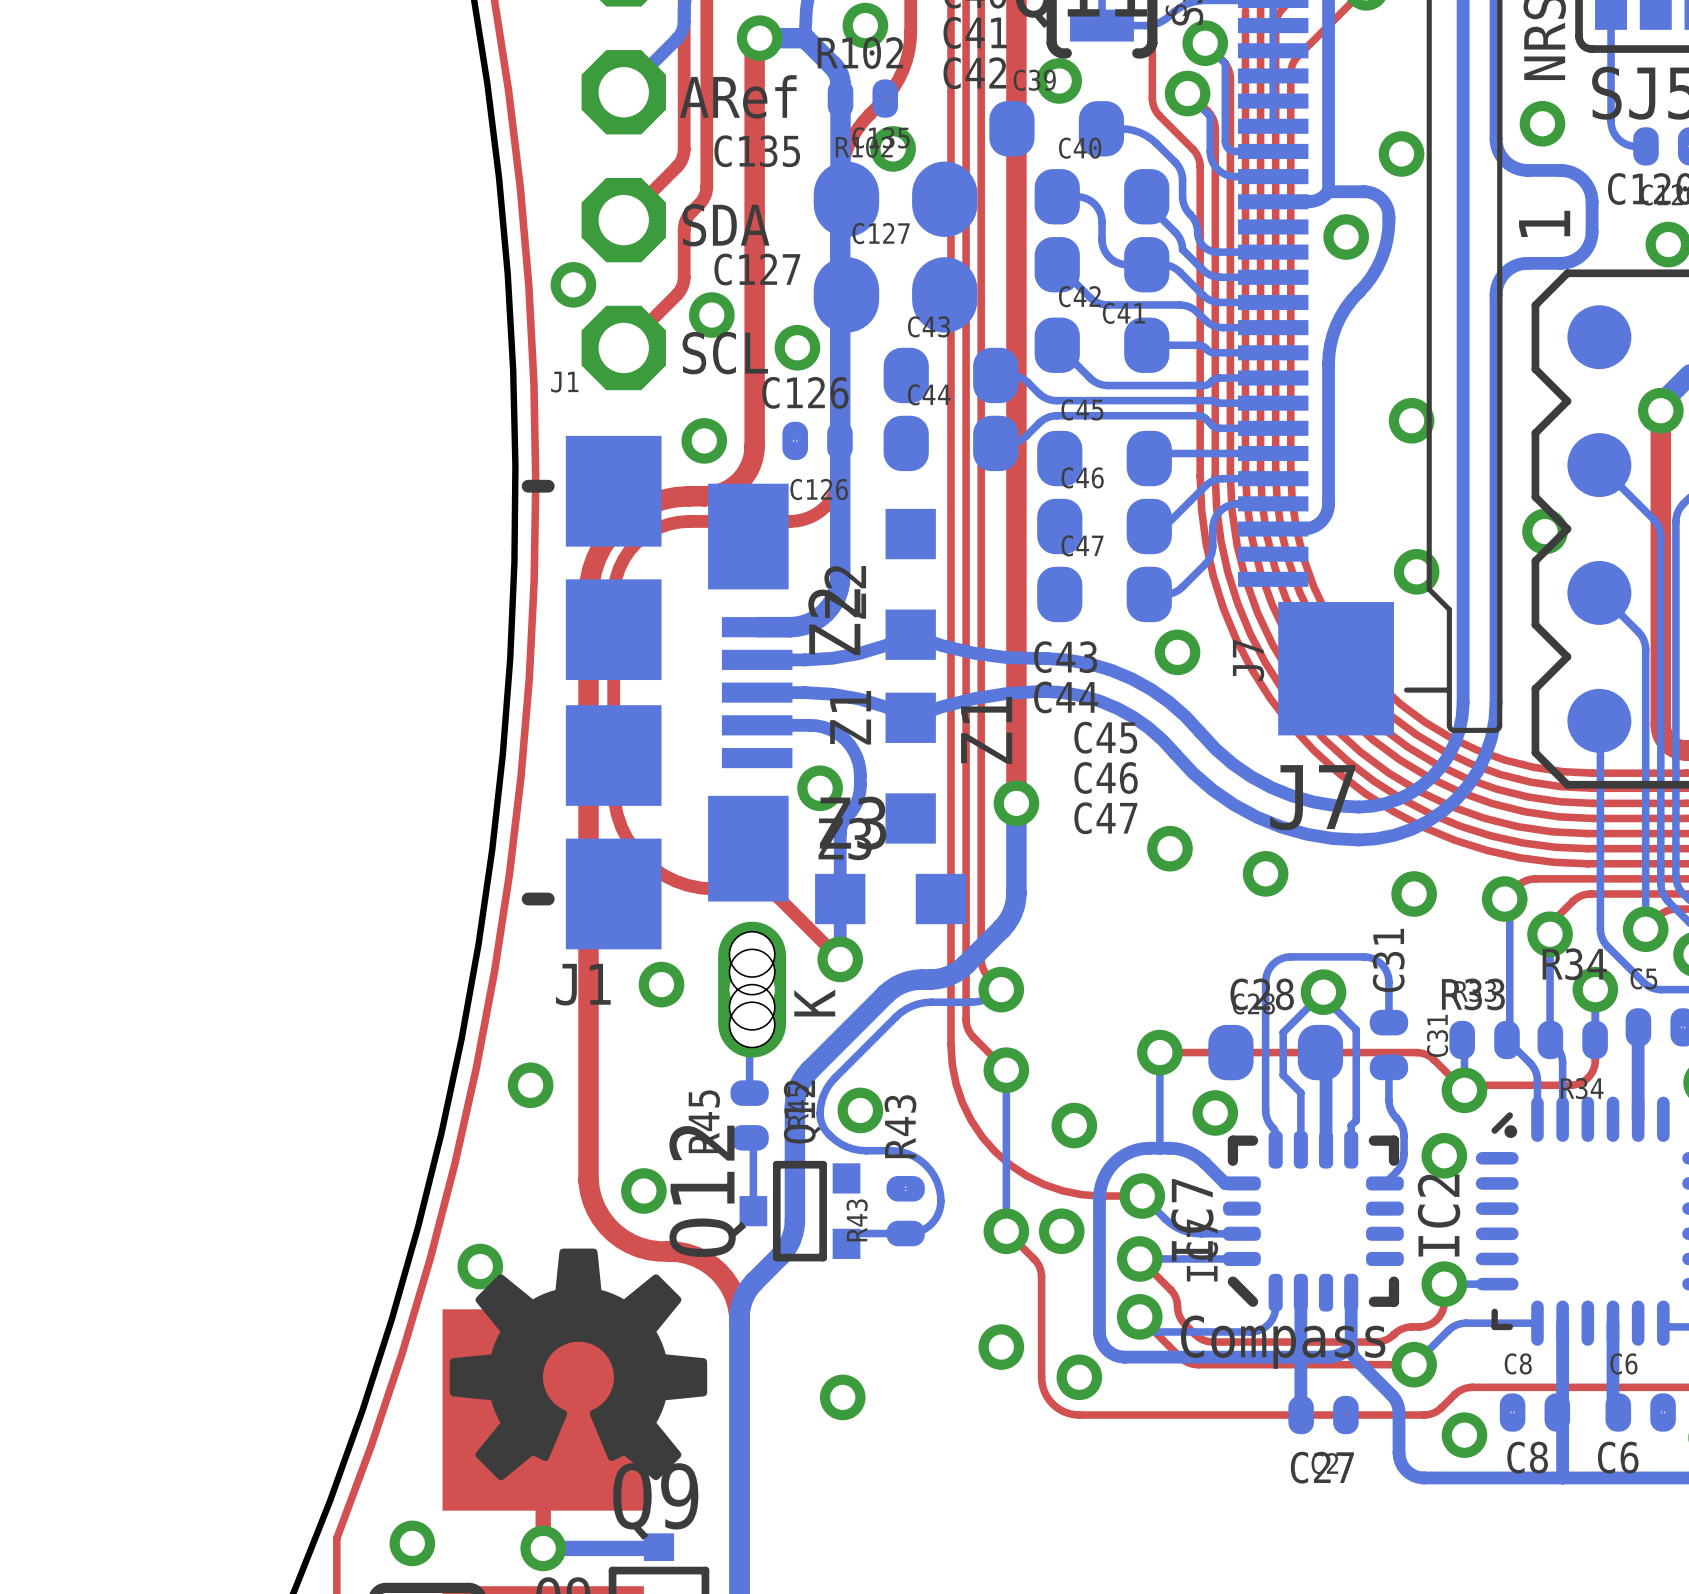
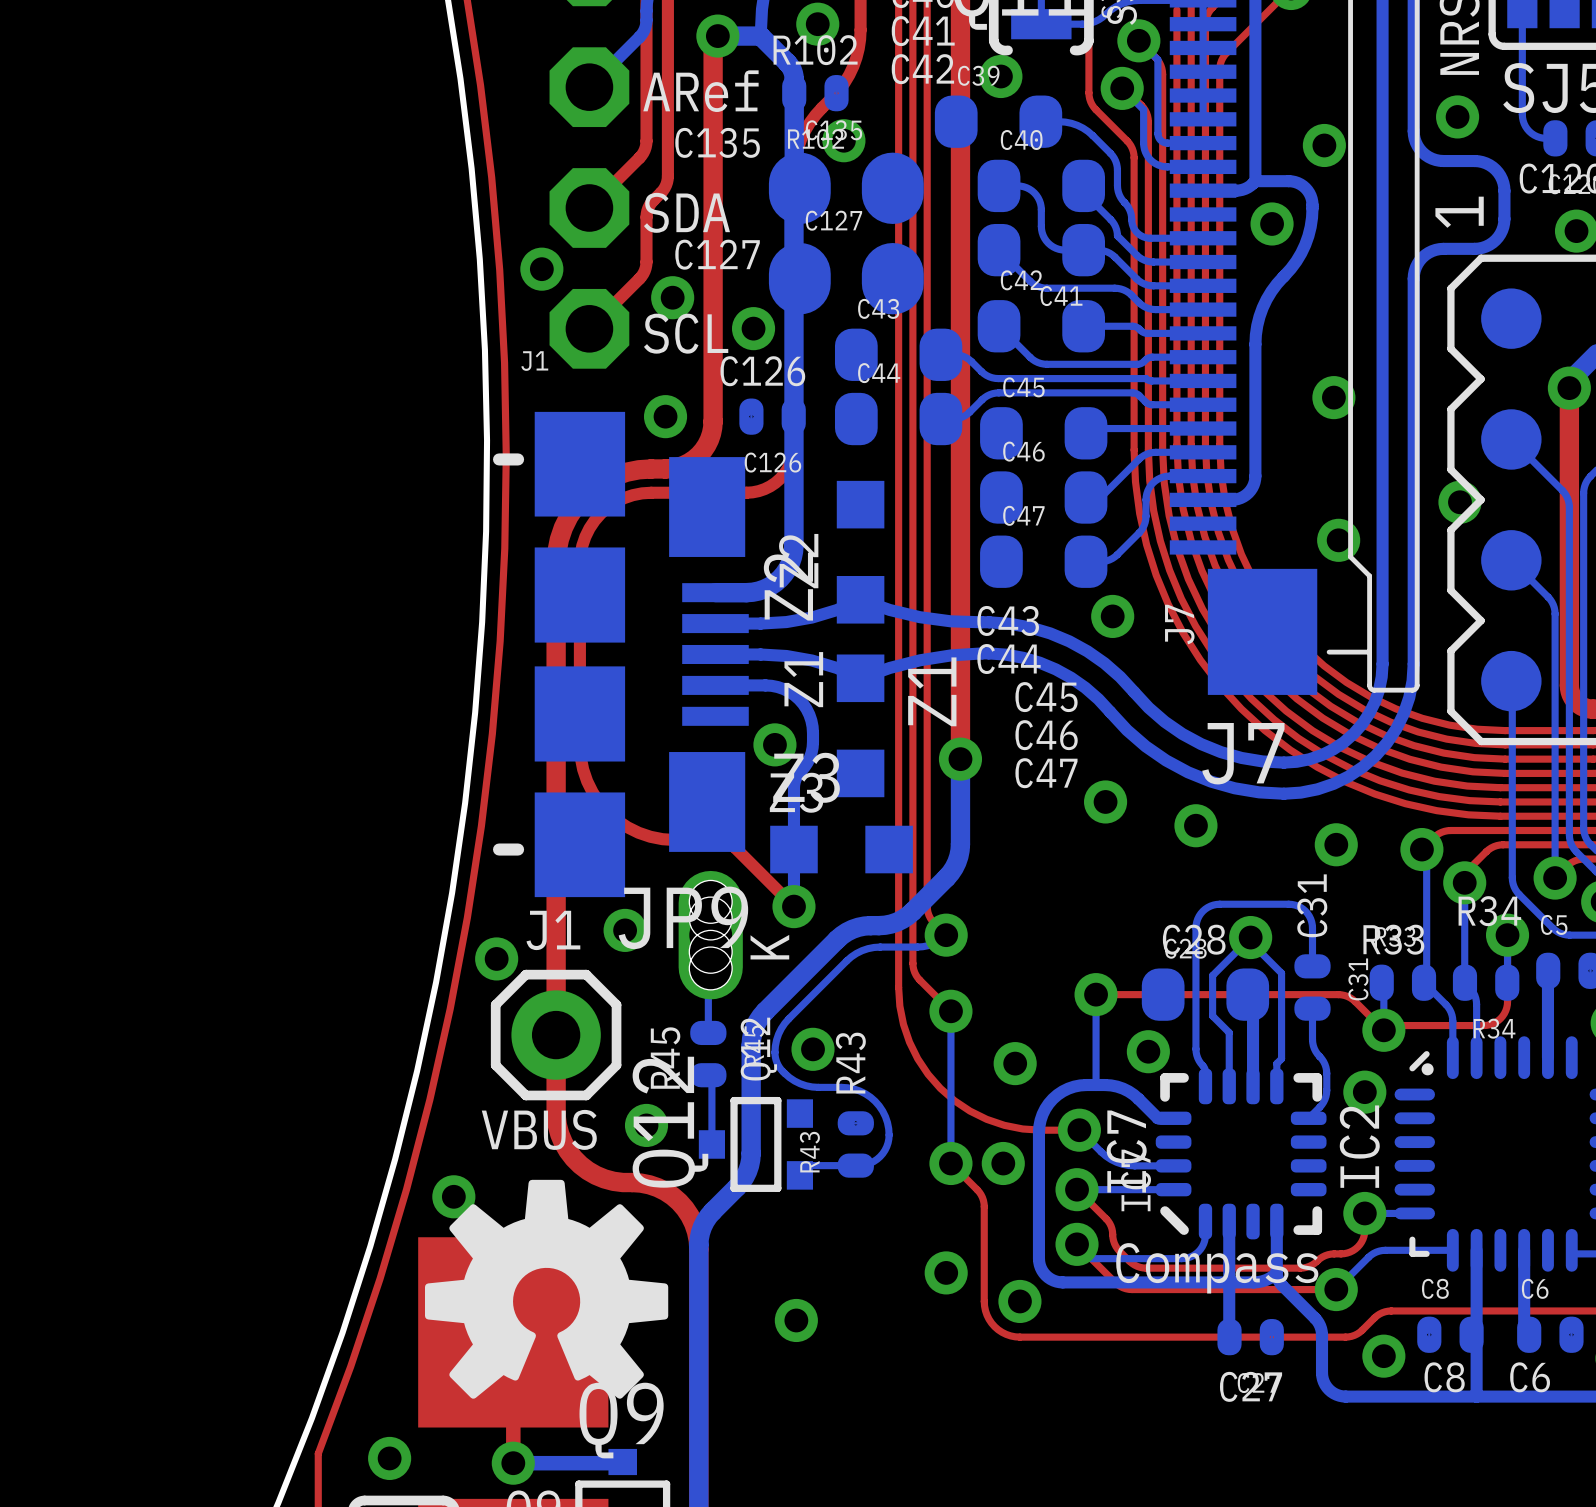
via position: (530, 1085) -> (496, 958)
JP9: none -> (556, 1035)
via position: (643, 1191) -> (646, 1125)
text: none -> VBUS (539, 1129)

